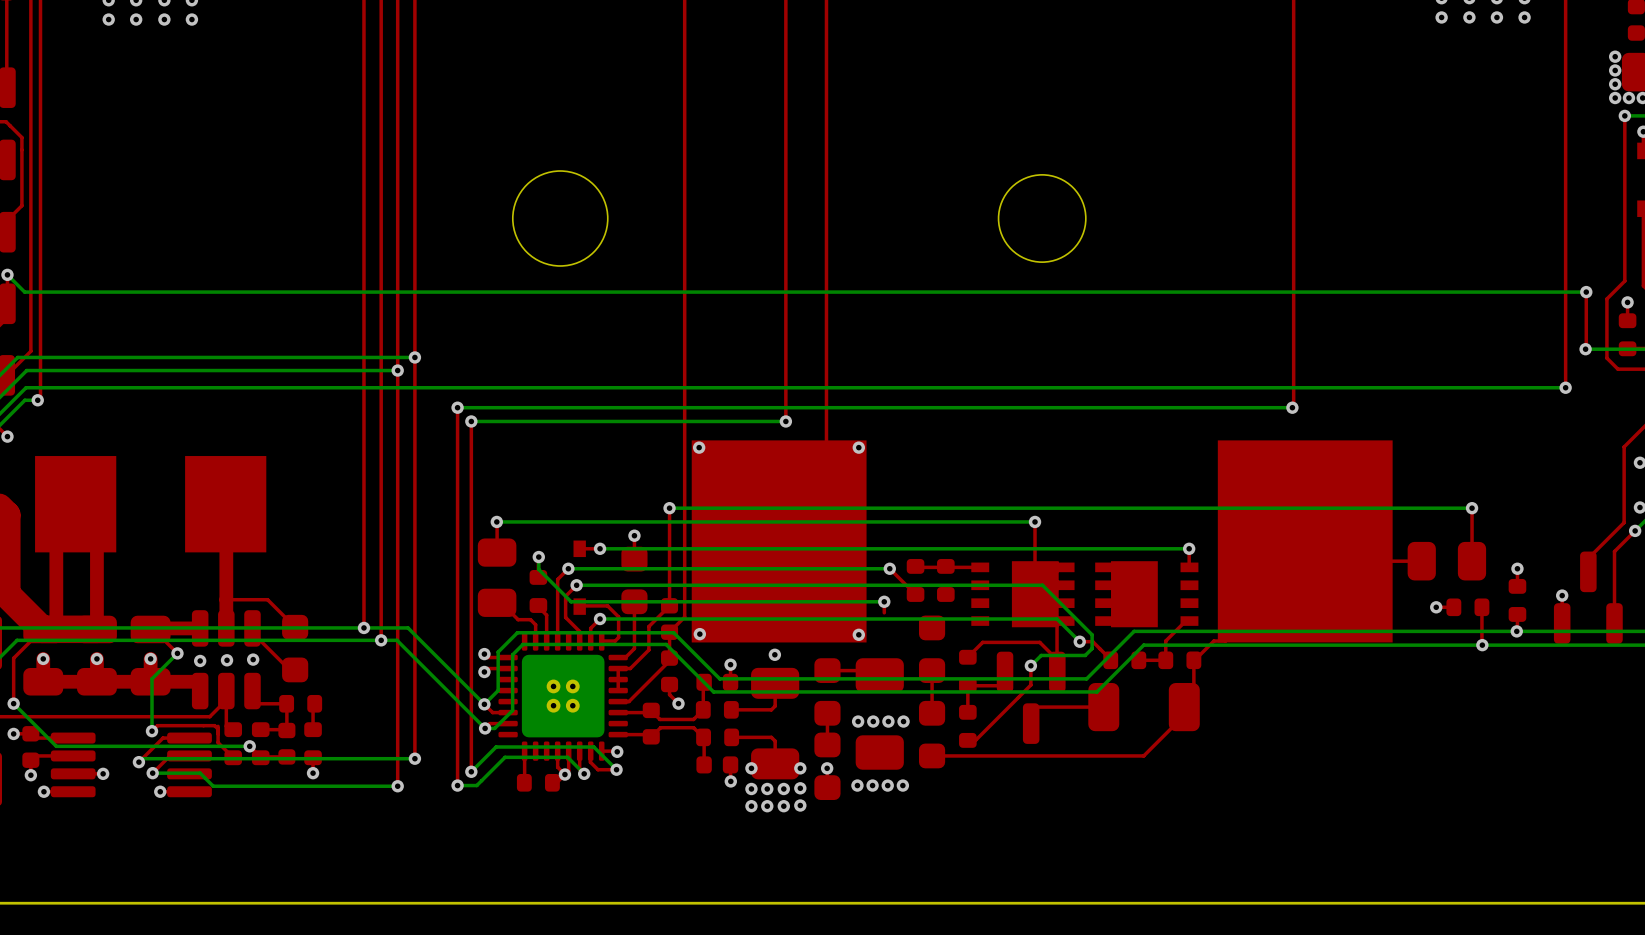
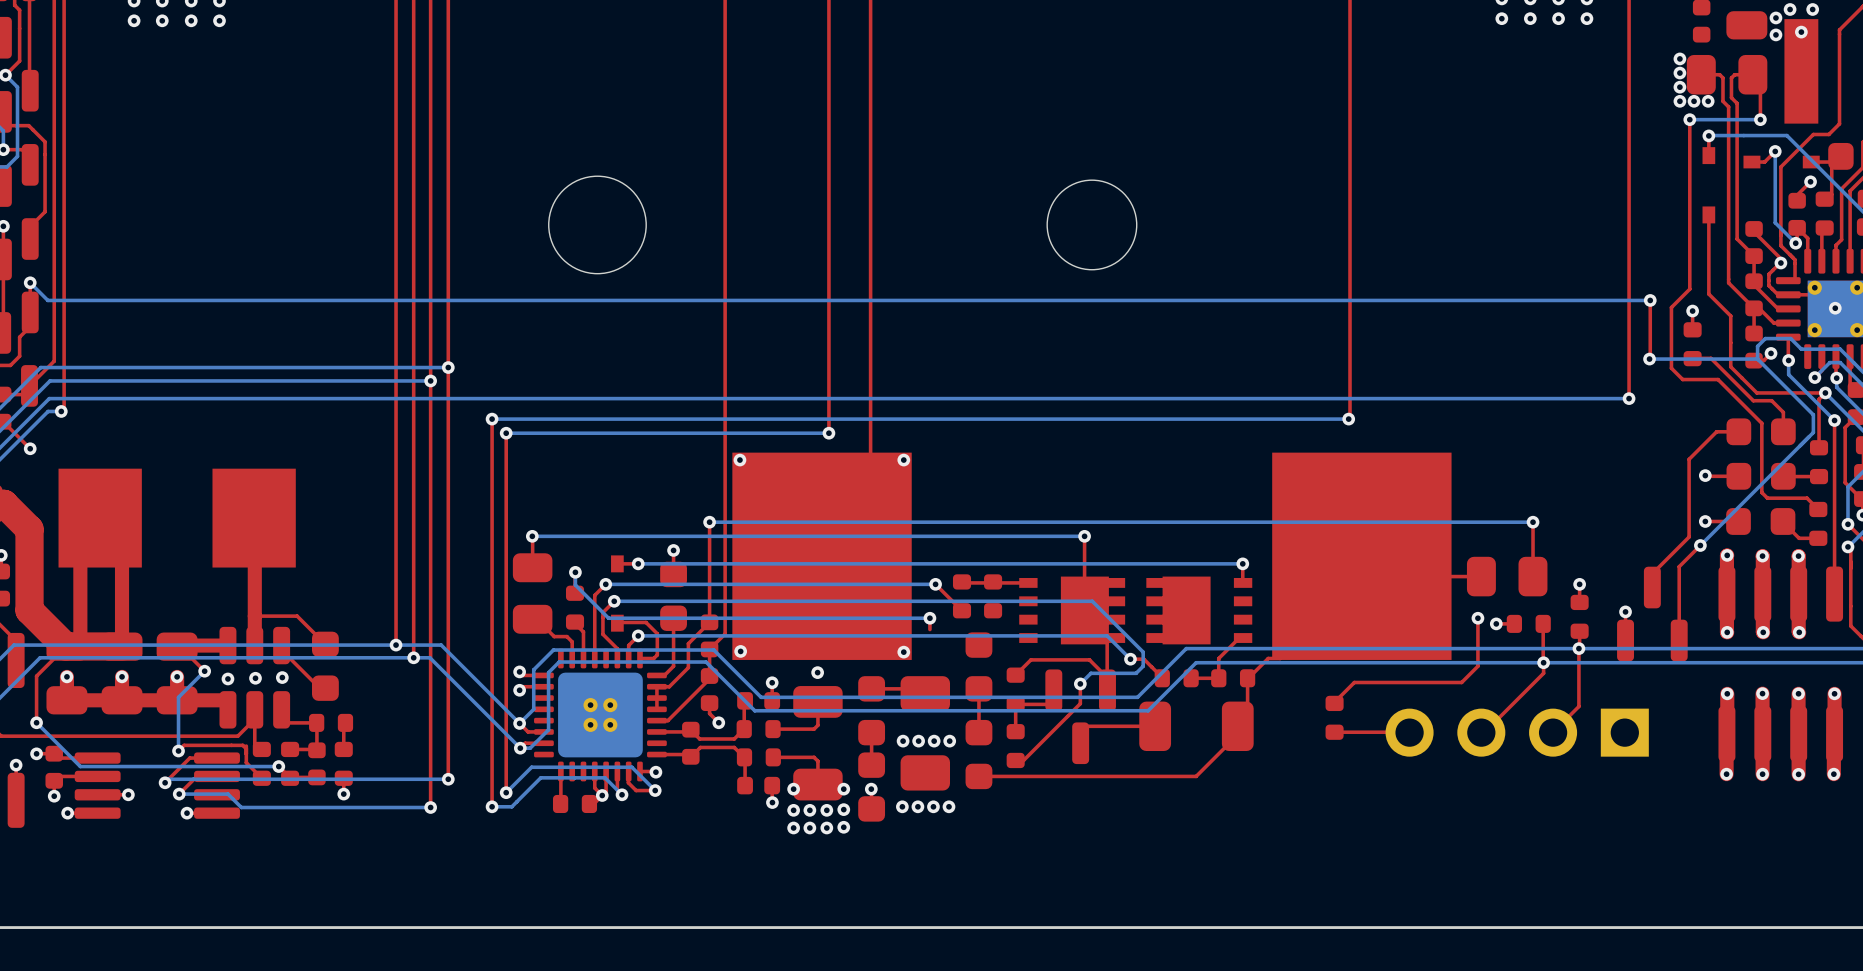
top track: none -> (1477, 618) (1477, 666) (1461, 682) (1354, 682) (1332, 704)
via: none -> (1477, 618)
top track: none -> (1578, 648) (1578, 706) (1553, 731)
top track: none -> (1543, 662) (1543, 673) (1482, 734)
part: none -> (1334, 717)
top track: none -> (1334, 732) (1413, 732)
part: none -> (1517, 732)

